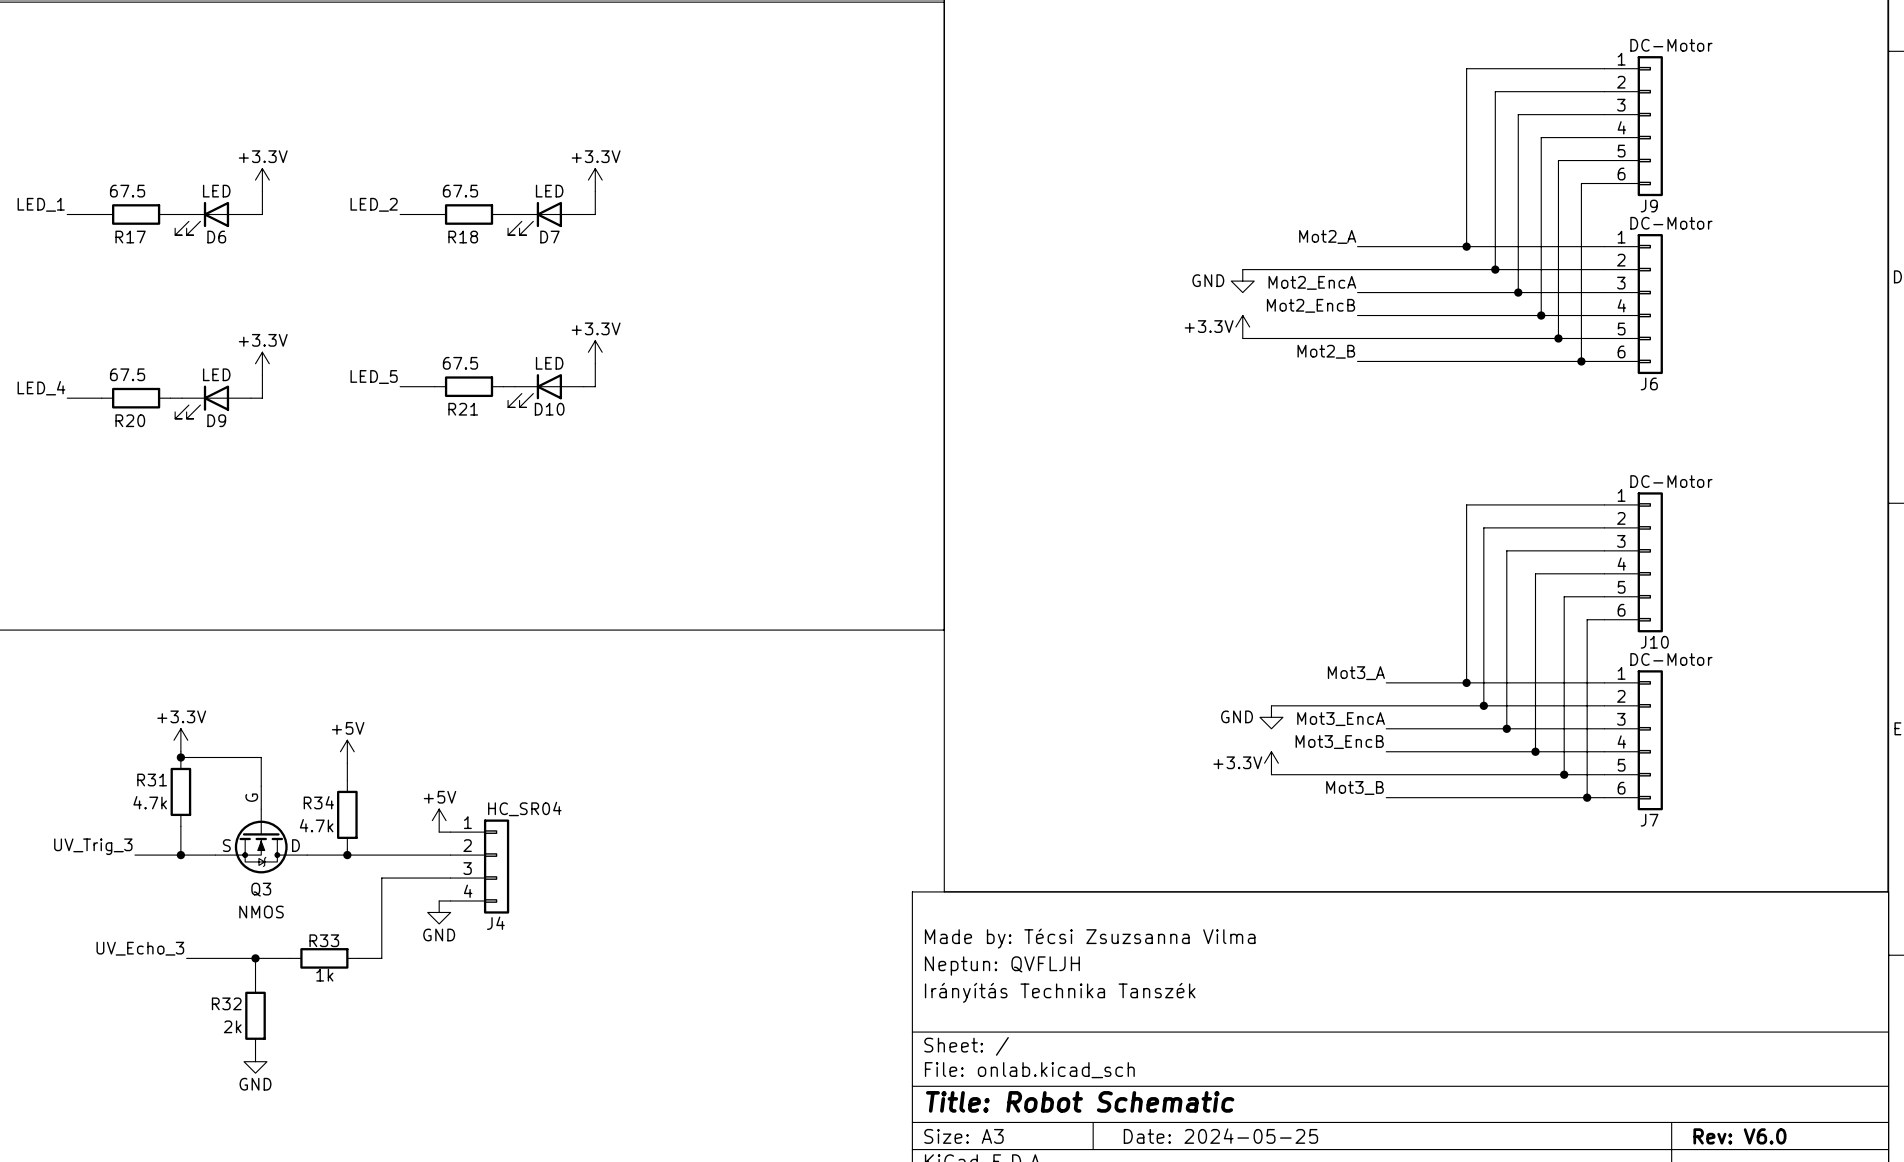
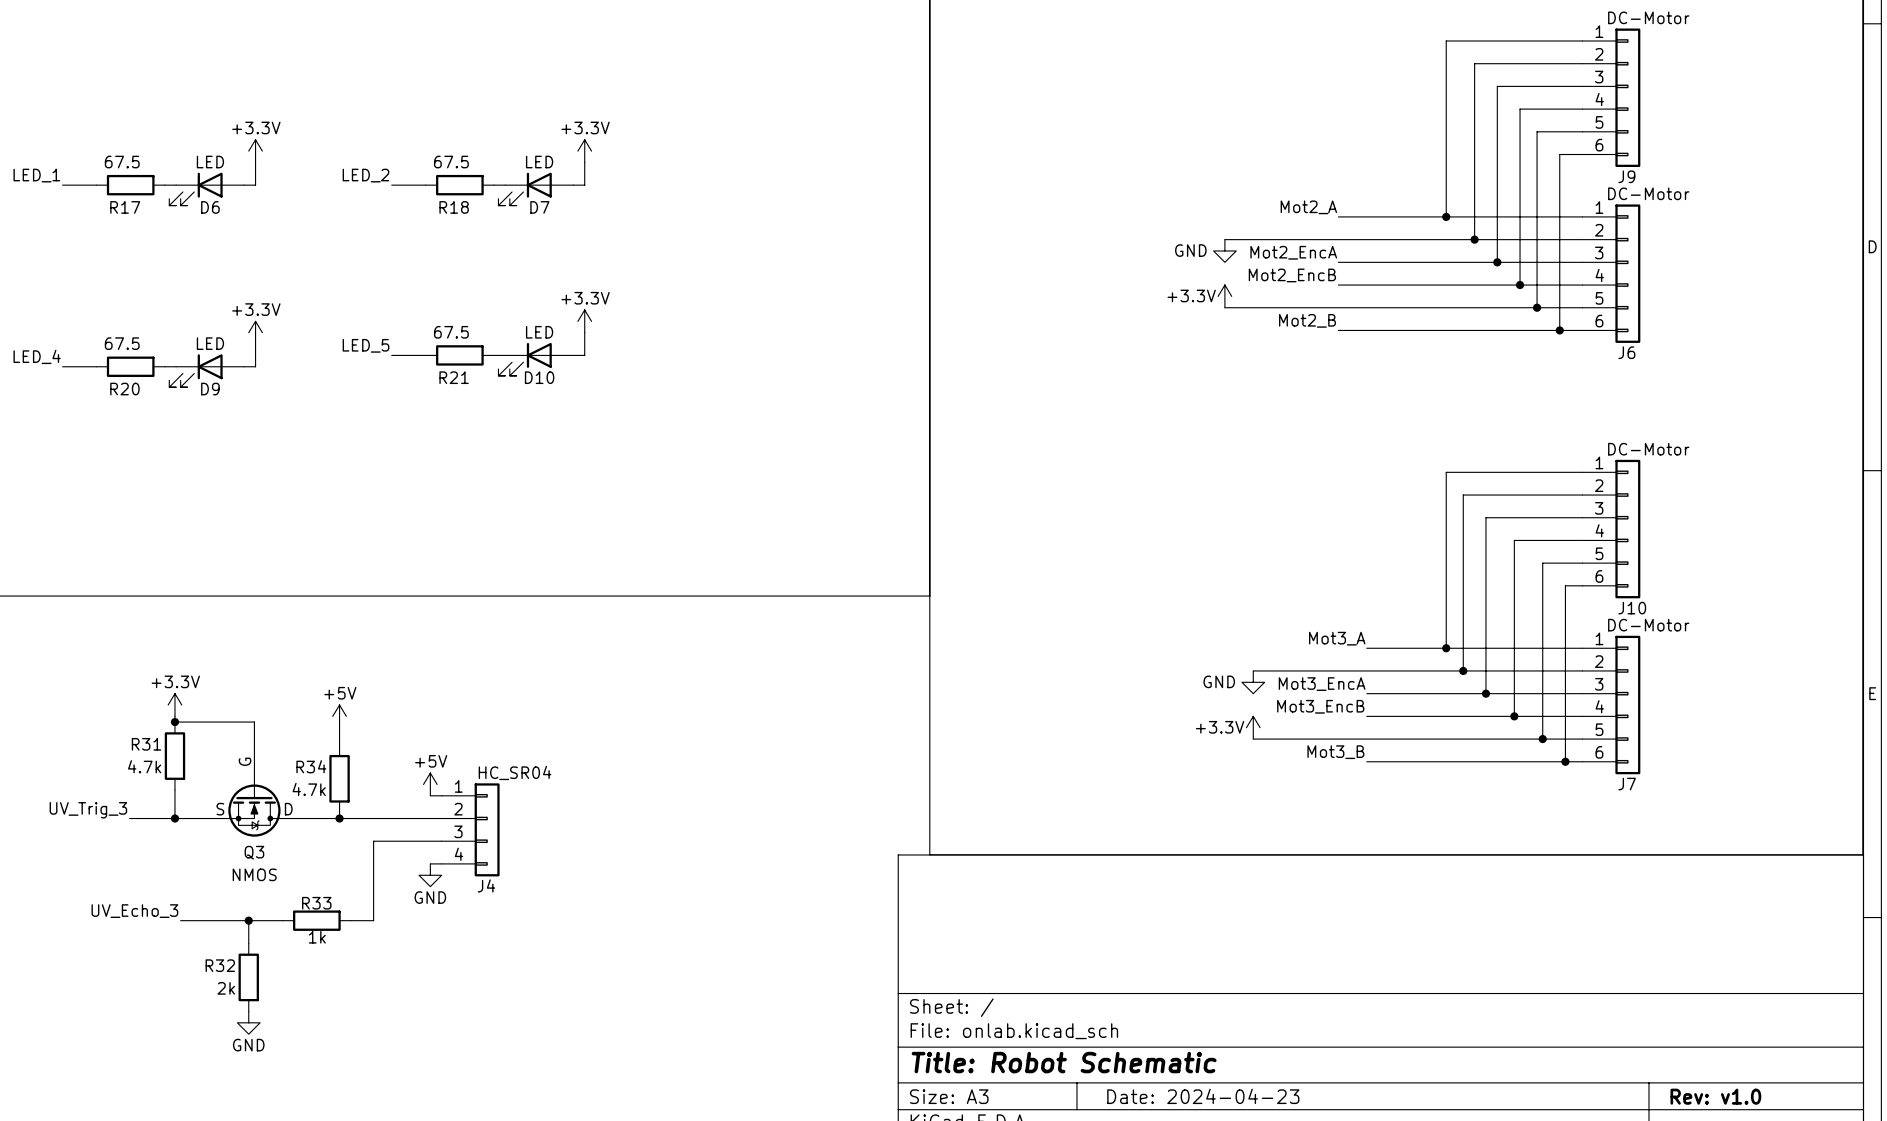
title block: Made by: Técsi Zsuzsanna Vilma (1090, 938) -> none
title block: Neptun: QVFLJH (1002, 966) -> none
title block: Irányítás Technika Tanszék (1060, 992) -> none
title block: Date: 2024-05-25 (1220, 1136) -> Date: 2024-04-23 (1203, 1096)
title block: Rev: V6.0 (1739, 1136) -> Rev: v1.0 (1715, 1096)

